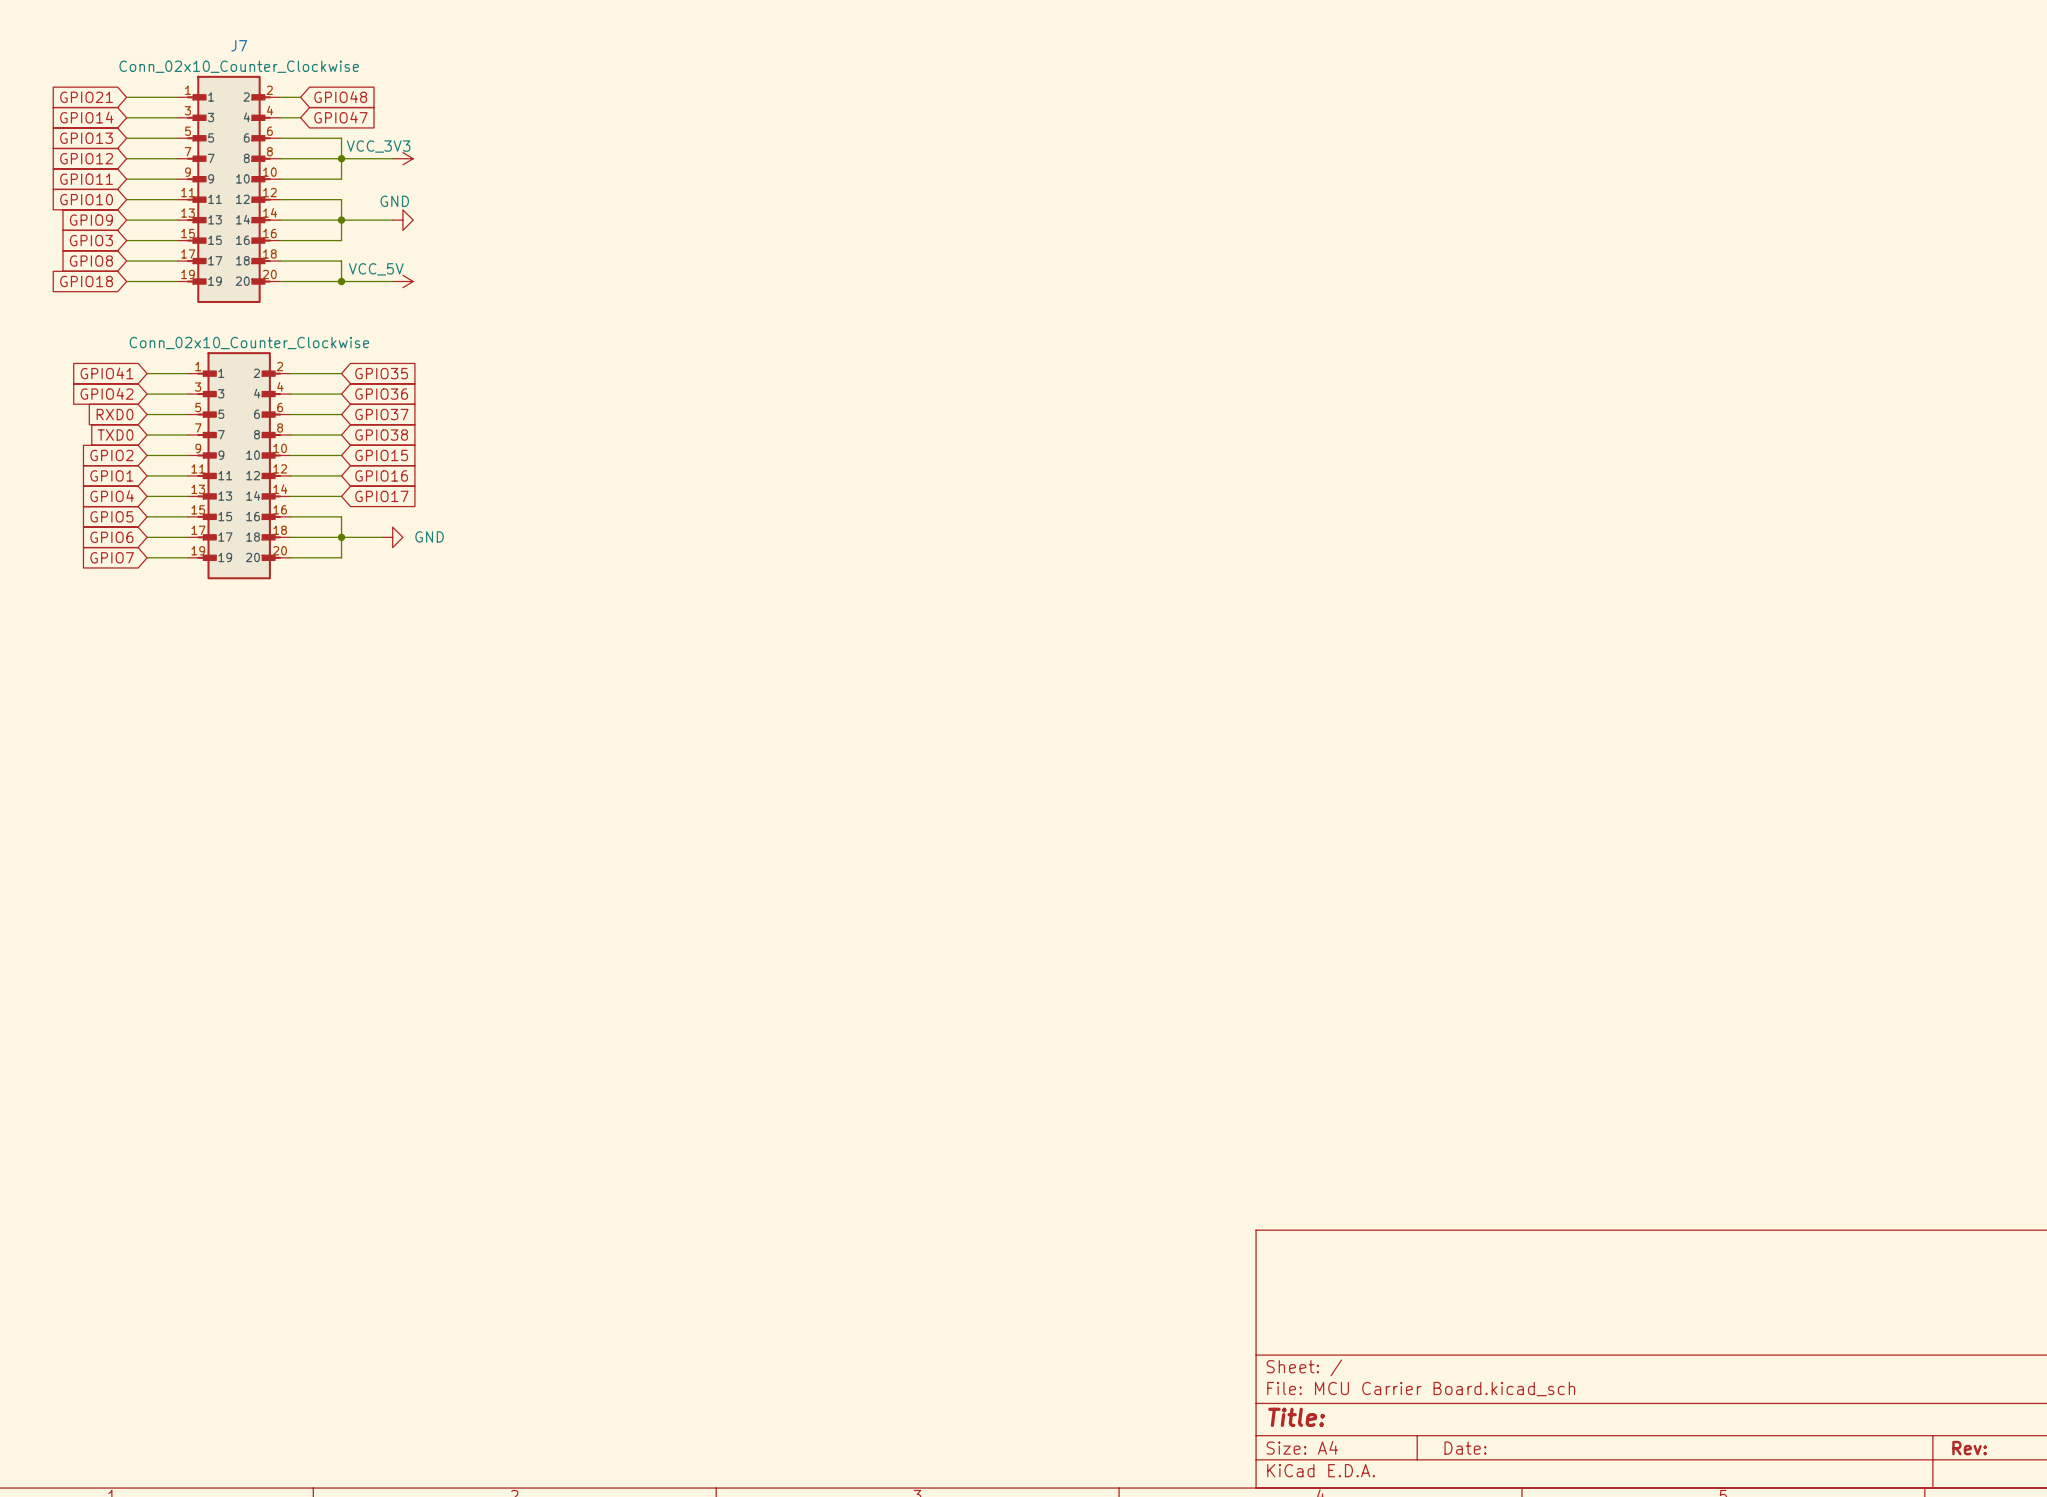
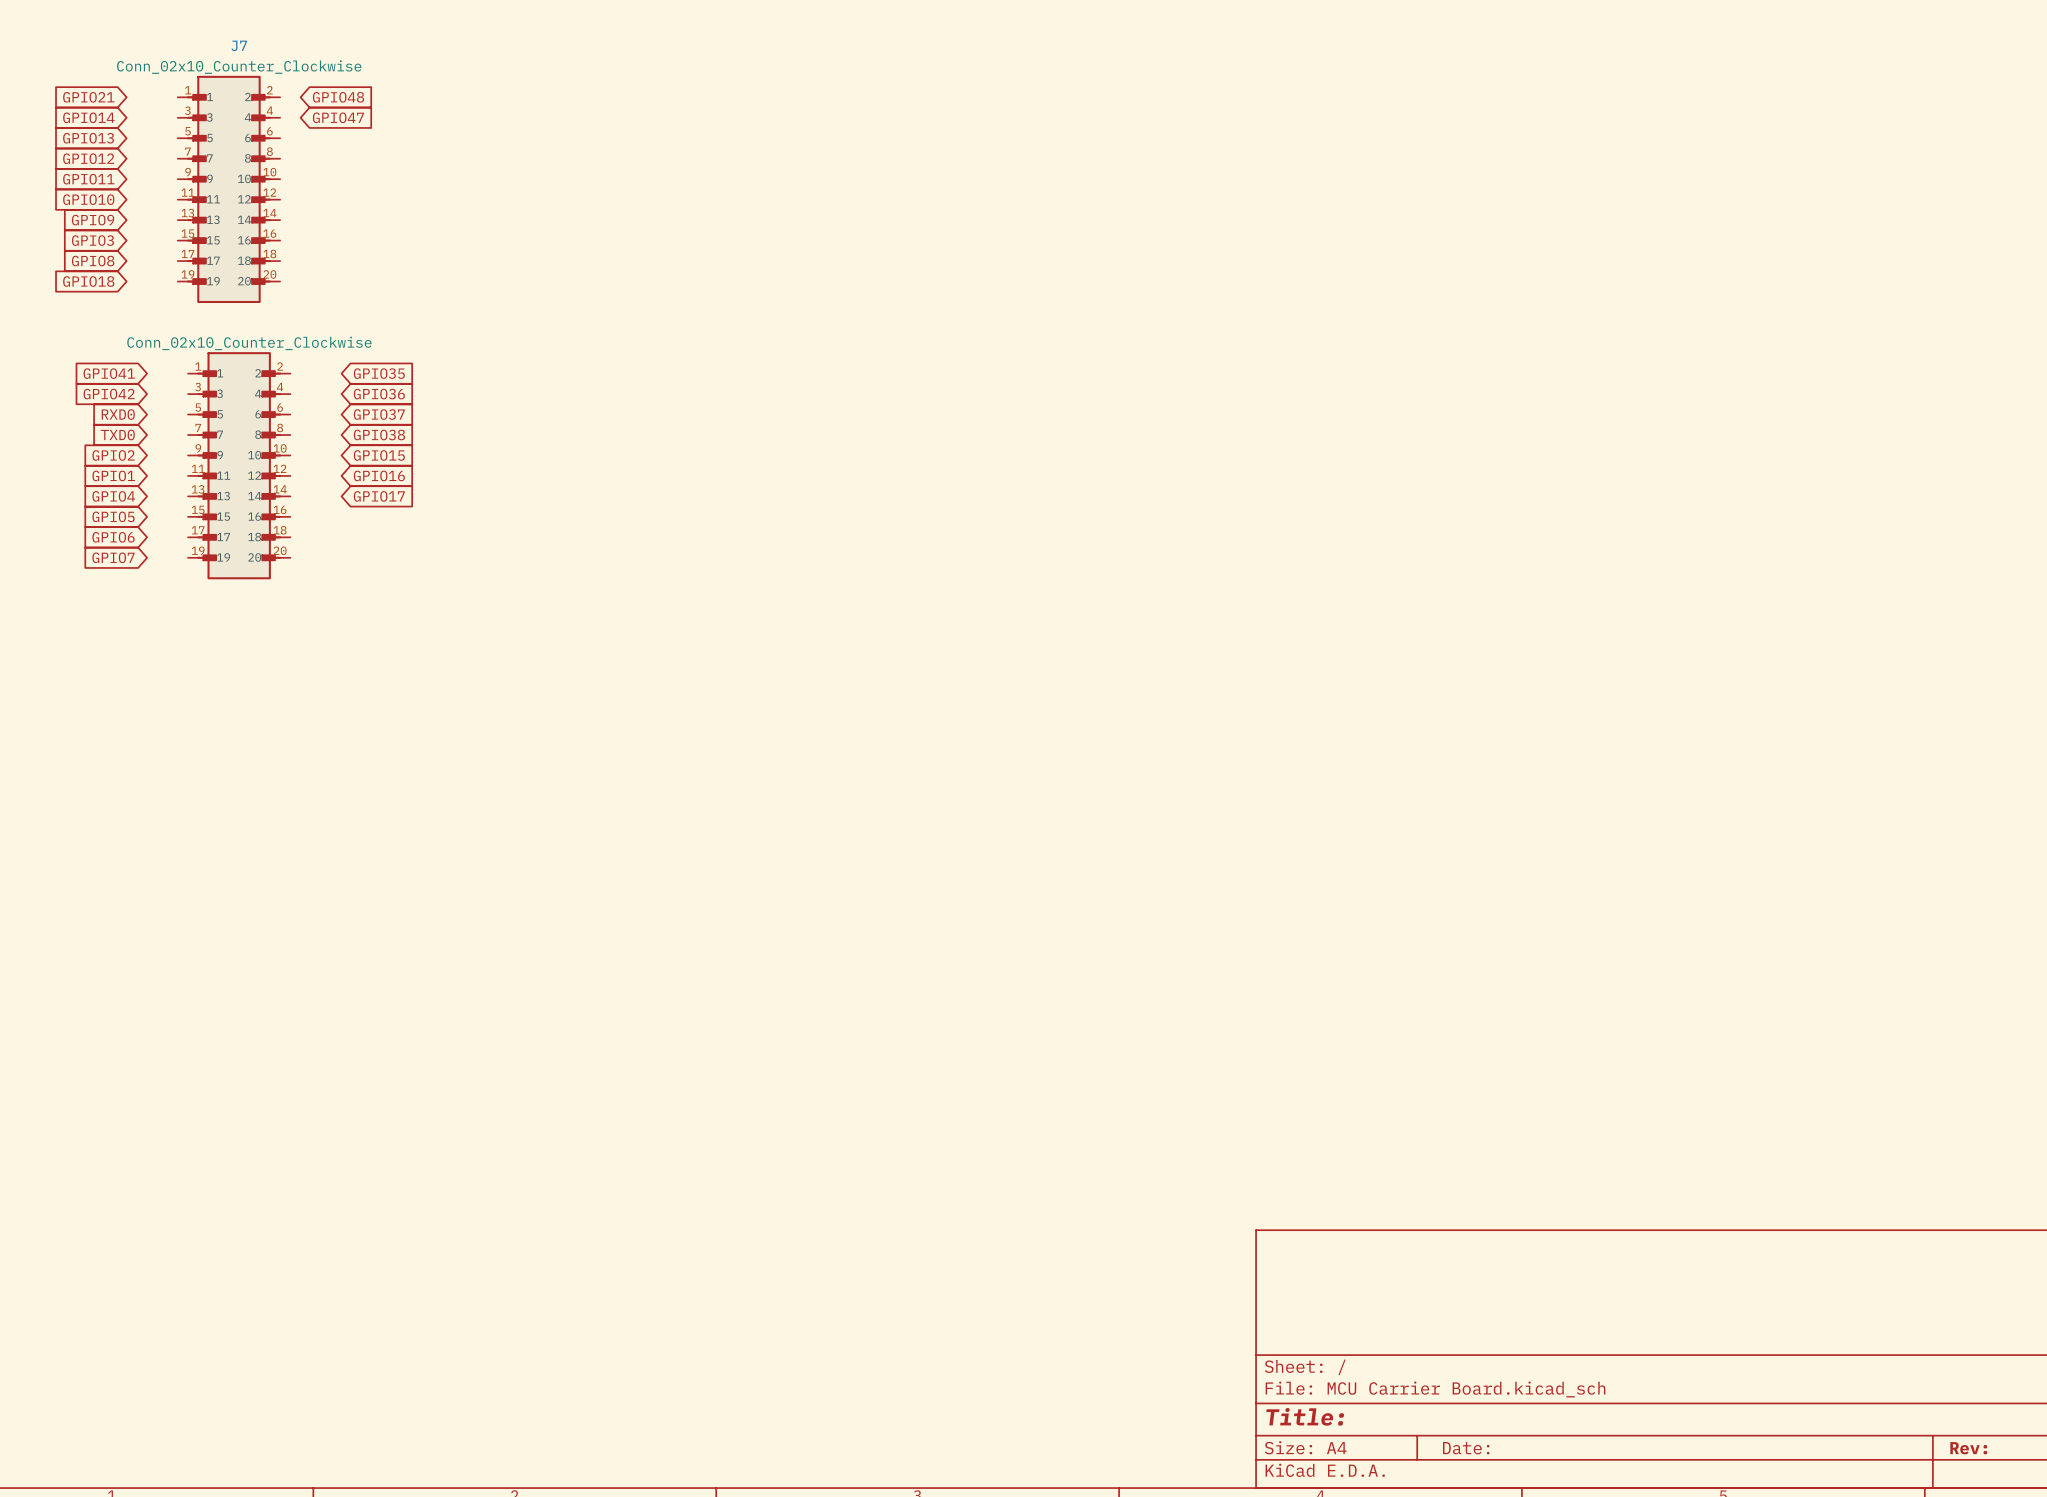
wire: (126, 97) (177, 97) -> none
wire: (280, 97) (300, 97) -> none
wire: (126, 117) (177, 117) -> none
wire: (280, 117) (300, 117) -> none
wire: (126, 138) (177, 138) -> none
wire: (280, 138) (341, 138) (341, 179) (280, 179) -> none
wire: (126, 158) (177, 158) -> none
wire: (280, 158) (392, 158) -> none
junction: (341, 158) -> none
power symbol: VCC_3V3 (402, 158) -> none
wire: (126, 179) (177, 179) -> none
wire: (126, 199) (177, 199) -> none
wire: (280, 199) (341, 199) (341, 240) (280, 240) -> none
wire: (126, 220) (177, 220) -> none
wire: (280, 220) (392, 220) -> none
junction: (341, 220) -> none
power symbol: GND (402, 220) -> none
wire: (126, 240) (177, 240) -> none
wire: (126, 261) (177, 261) -> none
wire: (280, 261) (341, 261) (341, 281) -> none
wire: (126, 281) (177, 281) -> none
wire: (280, 281) (392, 281) -> none
junction: (341, 281) -> none
power symbol: VCC_5V (402, 281) -> none
wire: (147, 373) (188, 373) -> none
wire: (290, 373) (341, 373) -> none
wire: (147, 394) (188, 394) -> none
wire: (290, 394) (341, 394) -> none
wire: (147, 414) (188, 414) -> none
wire: (290, 414) (341, 414) -> none
wire: (147, 435) (188, 435) -> none
wire: (290, 435) (341, 435) -> none
wire: (147, 455) (188, 455) -> none
wire: (290, 455) (341, 455) -> none
wire: (147, 475) (188, 475) -> none
wire: (290, 475) (341, 475) -> none
wire: (147, 496) (188, 496) -> none
wire: (290, 496) (341, 496) -> none
wire: (147, 516) (188, 516) -> none
wire: (290, 516) (341, 516) (341, 557) (290, 557) -> none
wire: (147, 537) (188, 537) -> none
wire: (290, 537) (382, 537) -> none
junction: (341, 537) -> none
power symbol: GND (392, 537) -> none
wire: (147, 557) (188, 557) -> none

